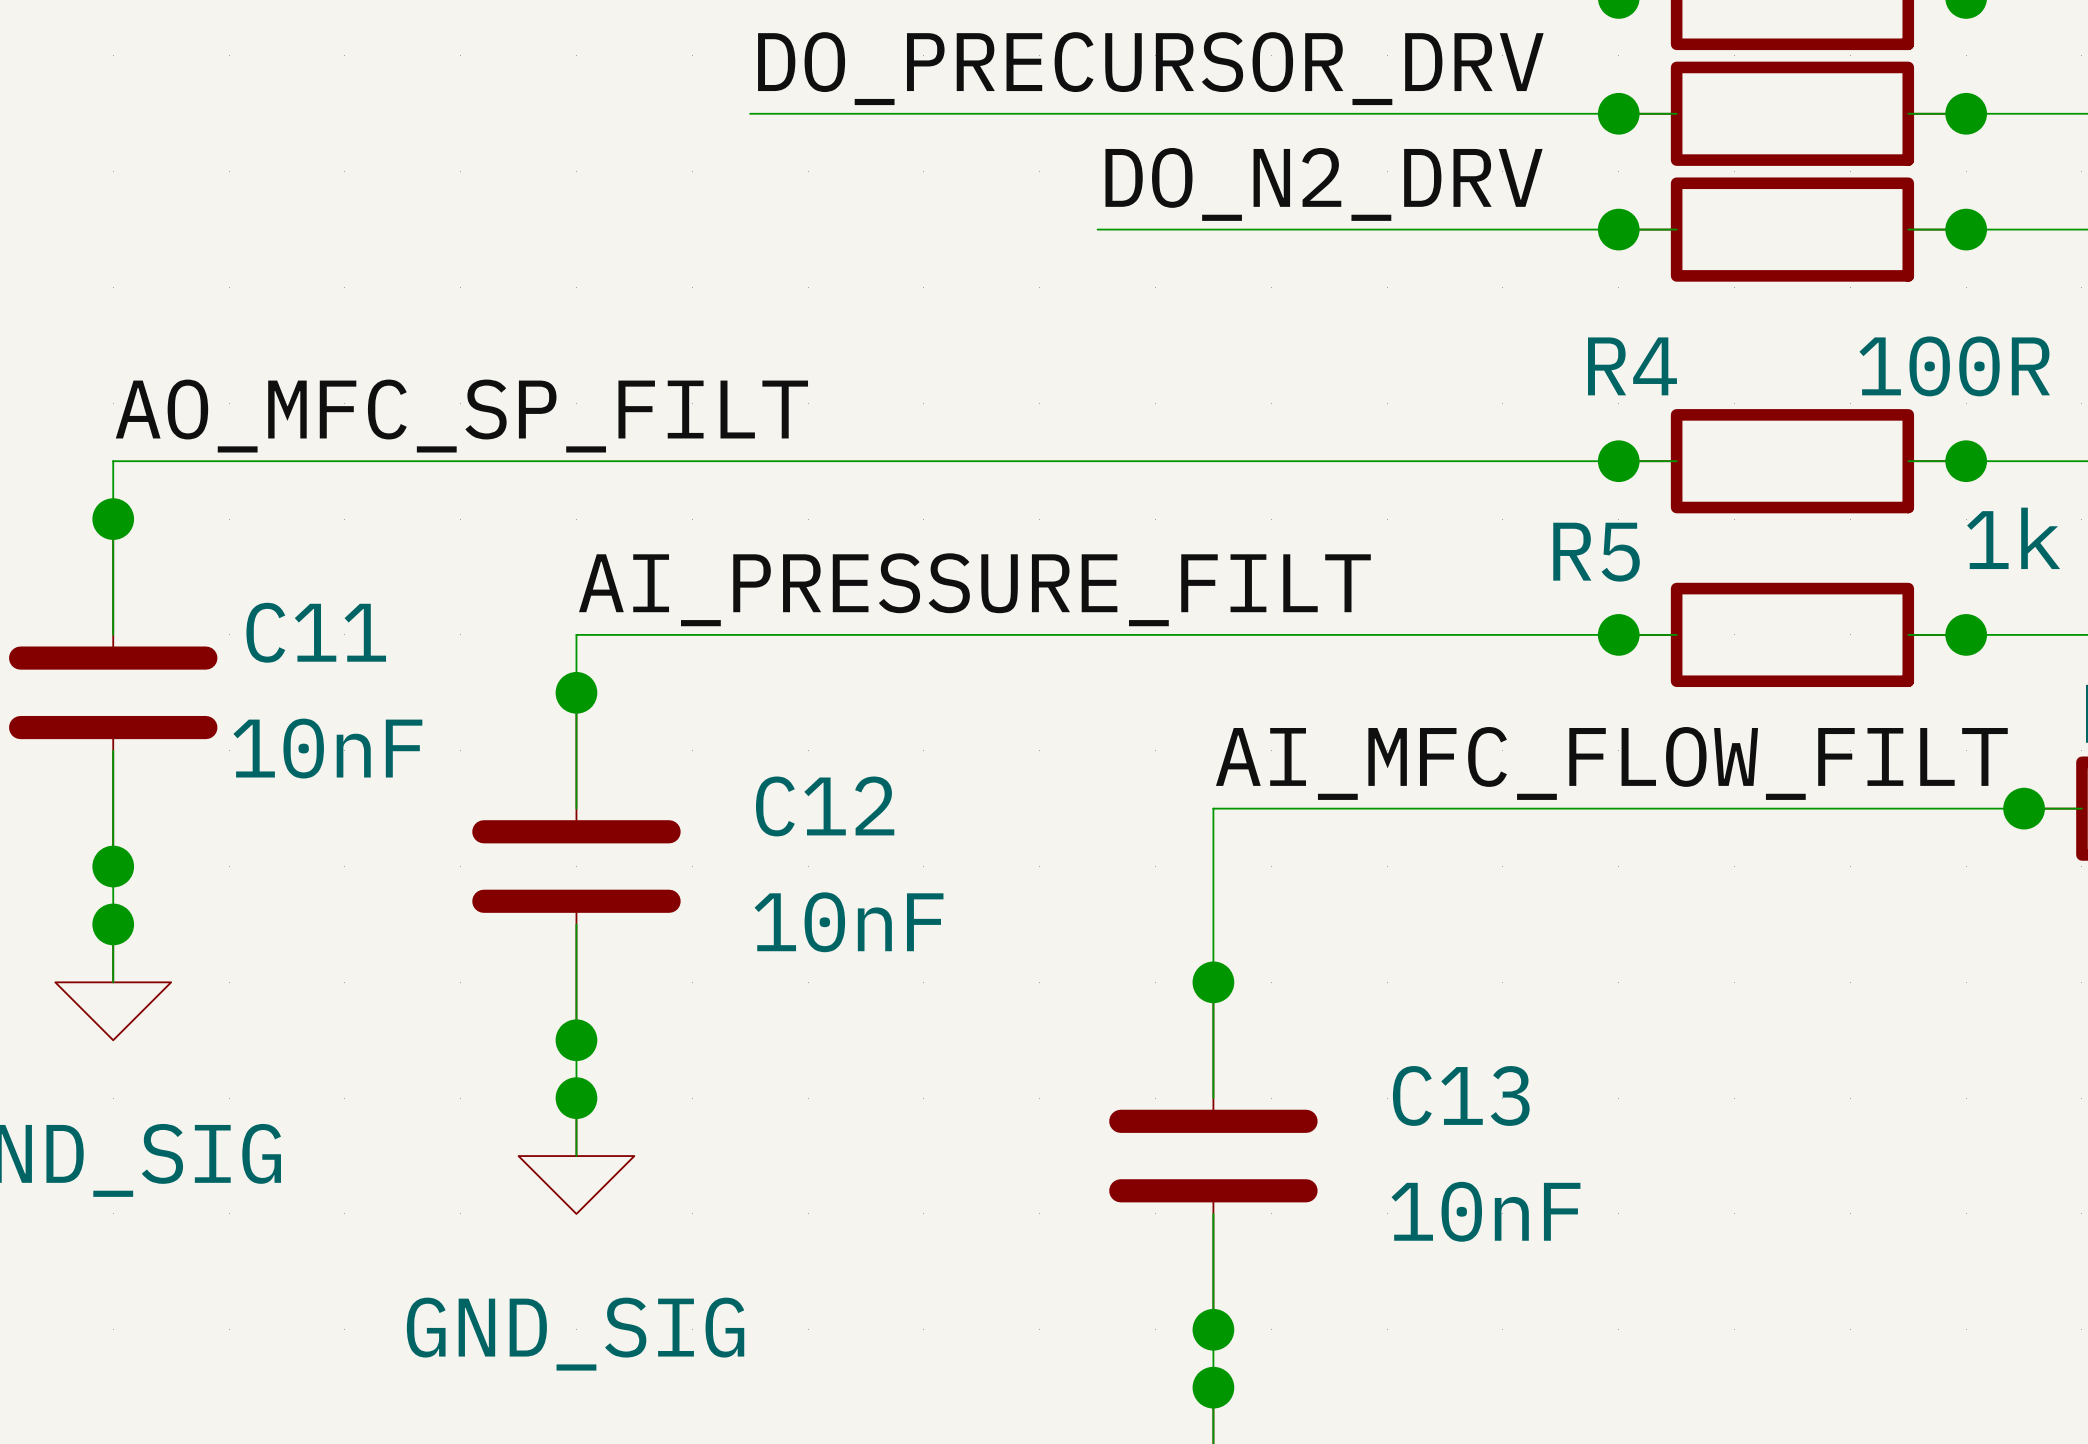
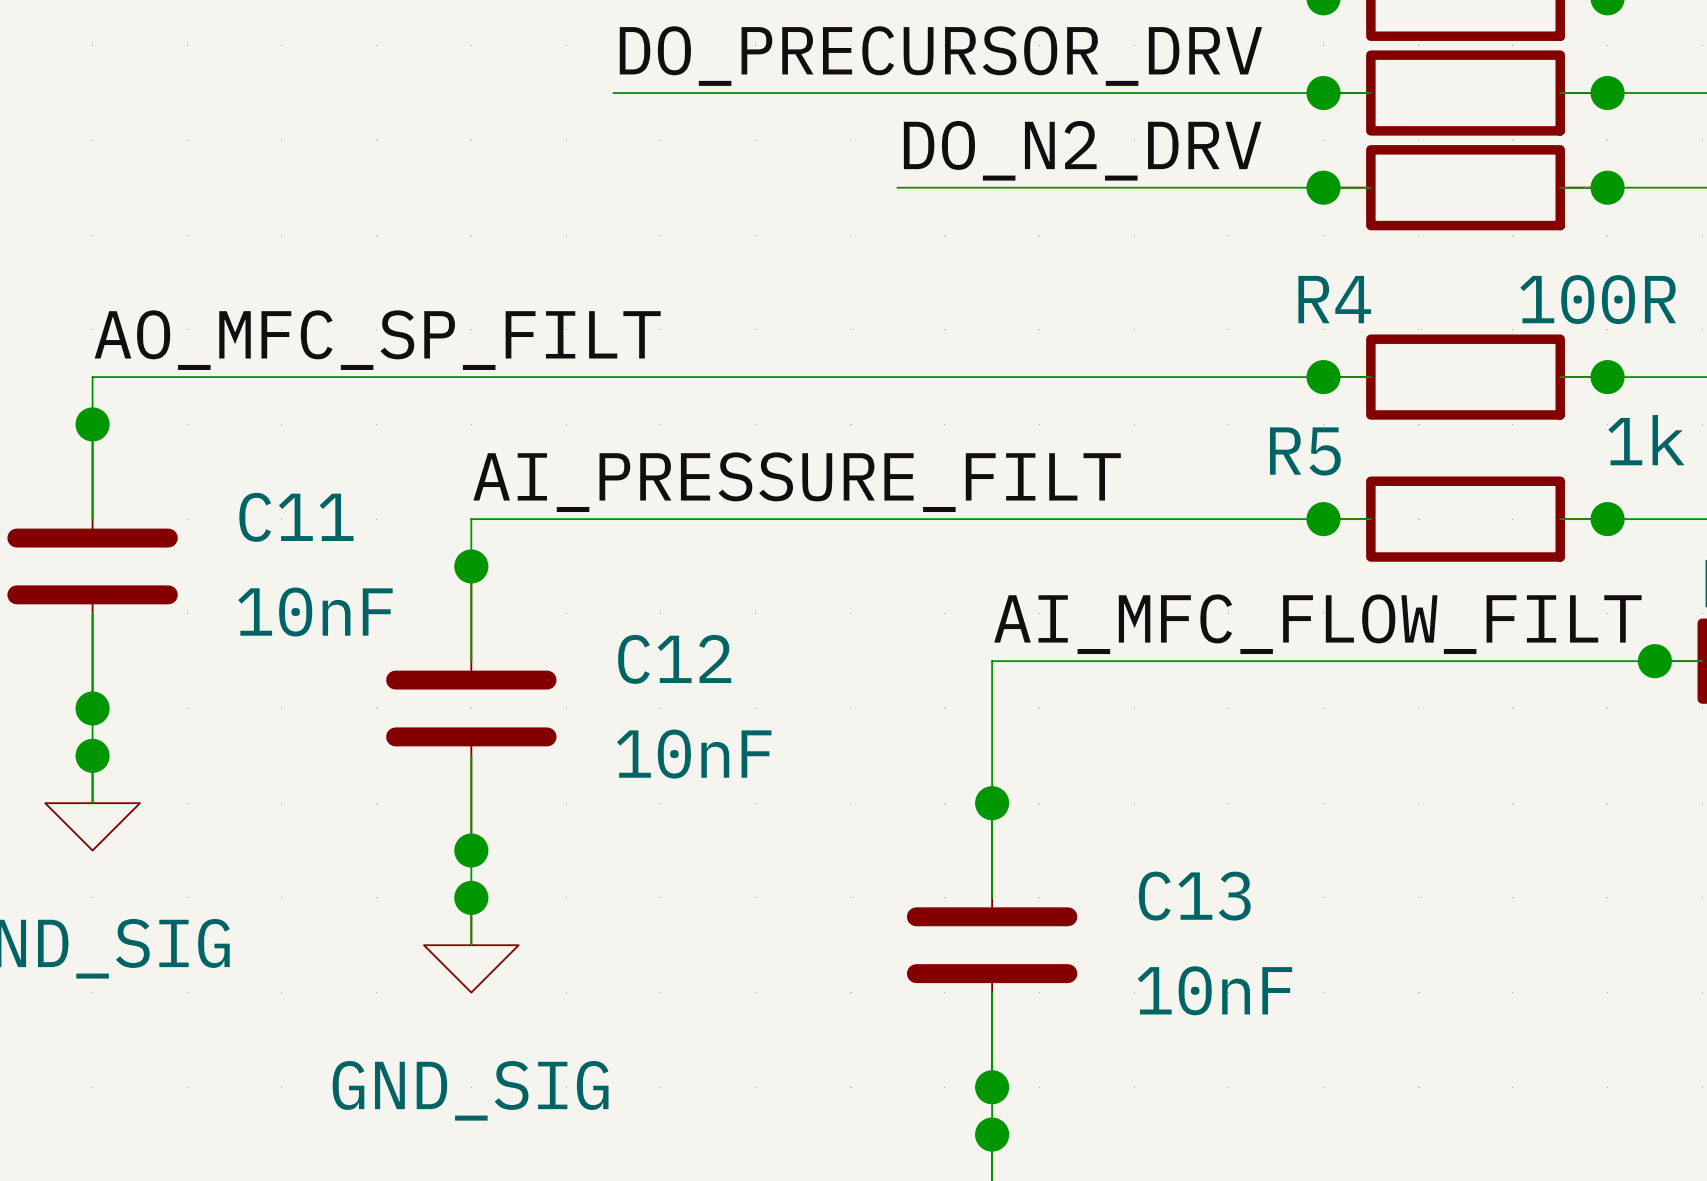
C11 name position: C11 (316, 632) -> C11 (296, 517)
C11 value position: 10nF (327, 748) -> 10nF (315, 612)

